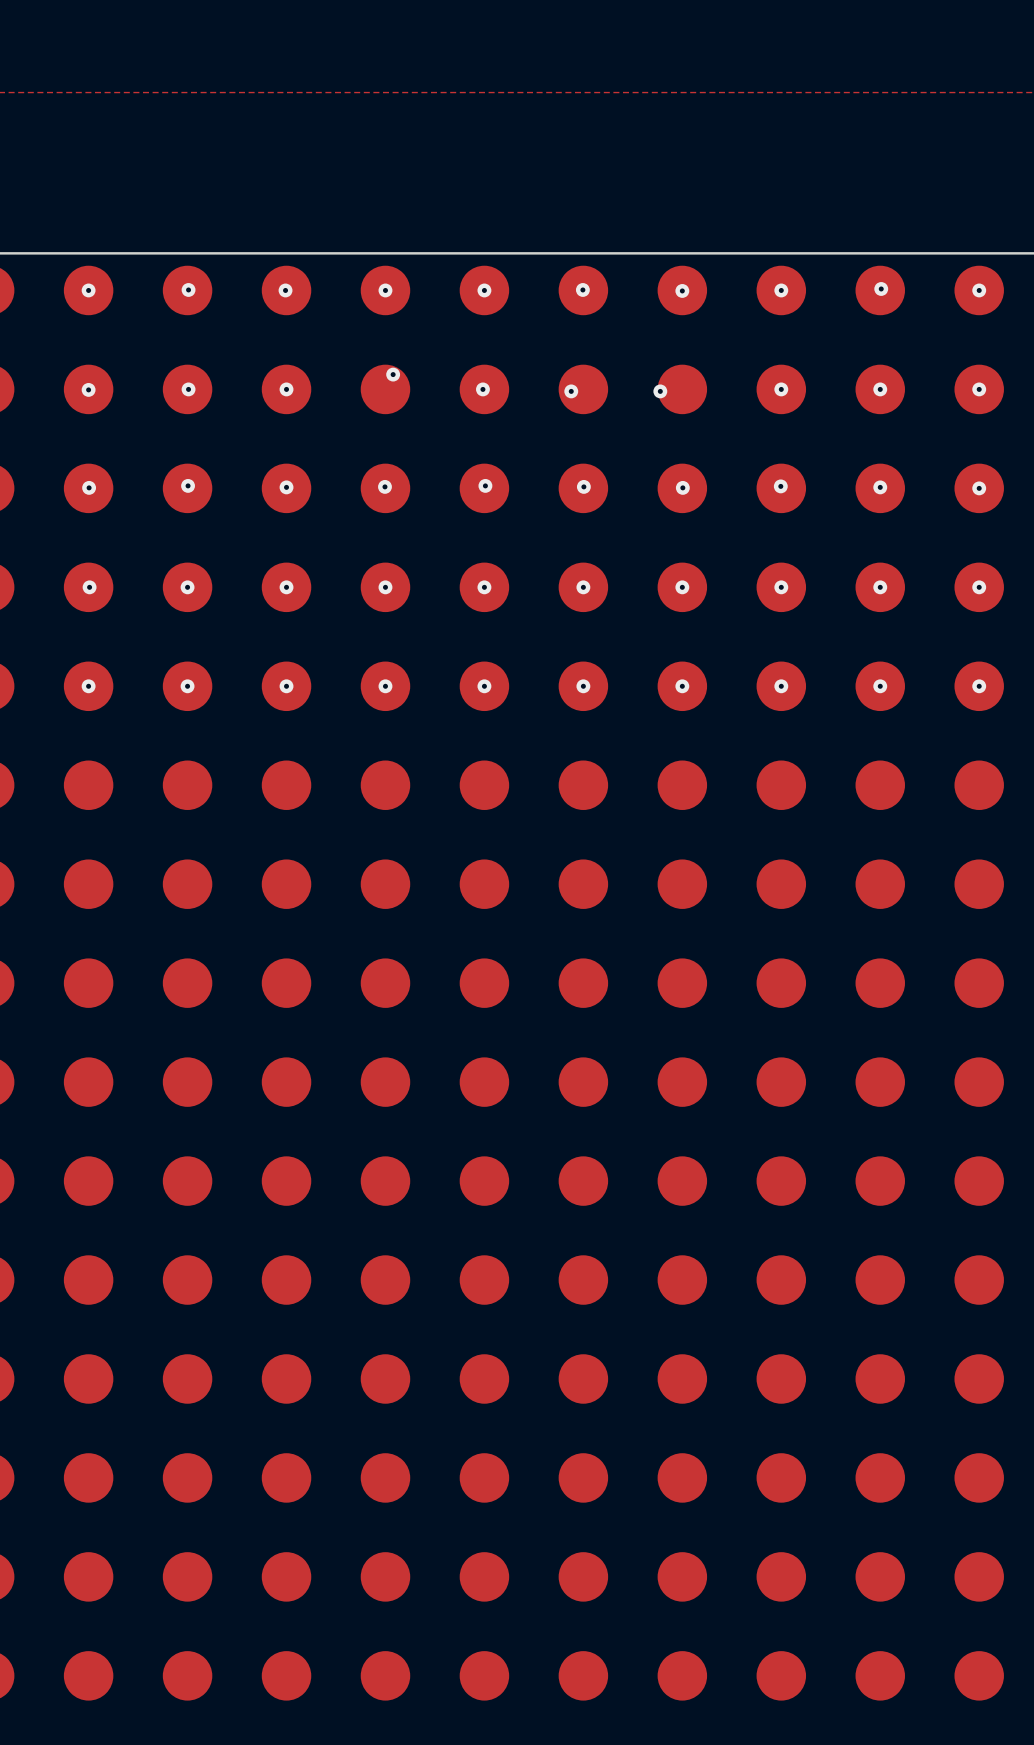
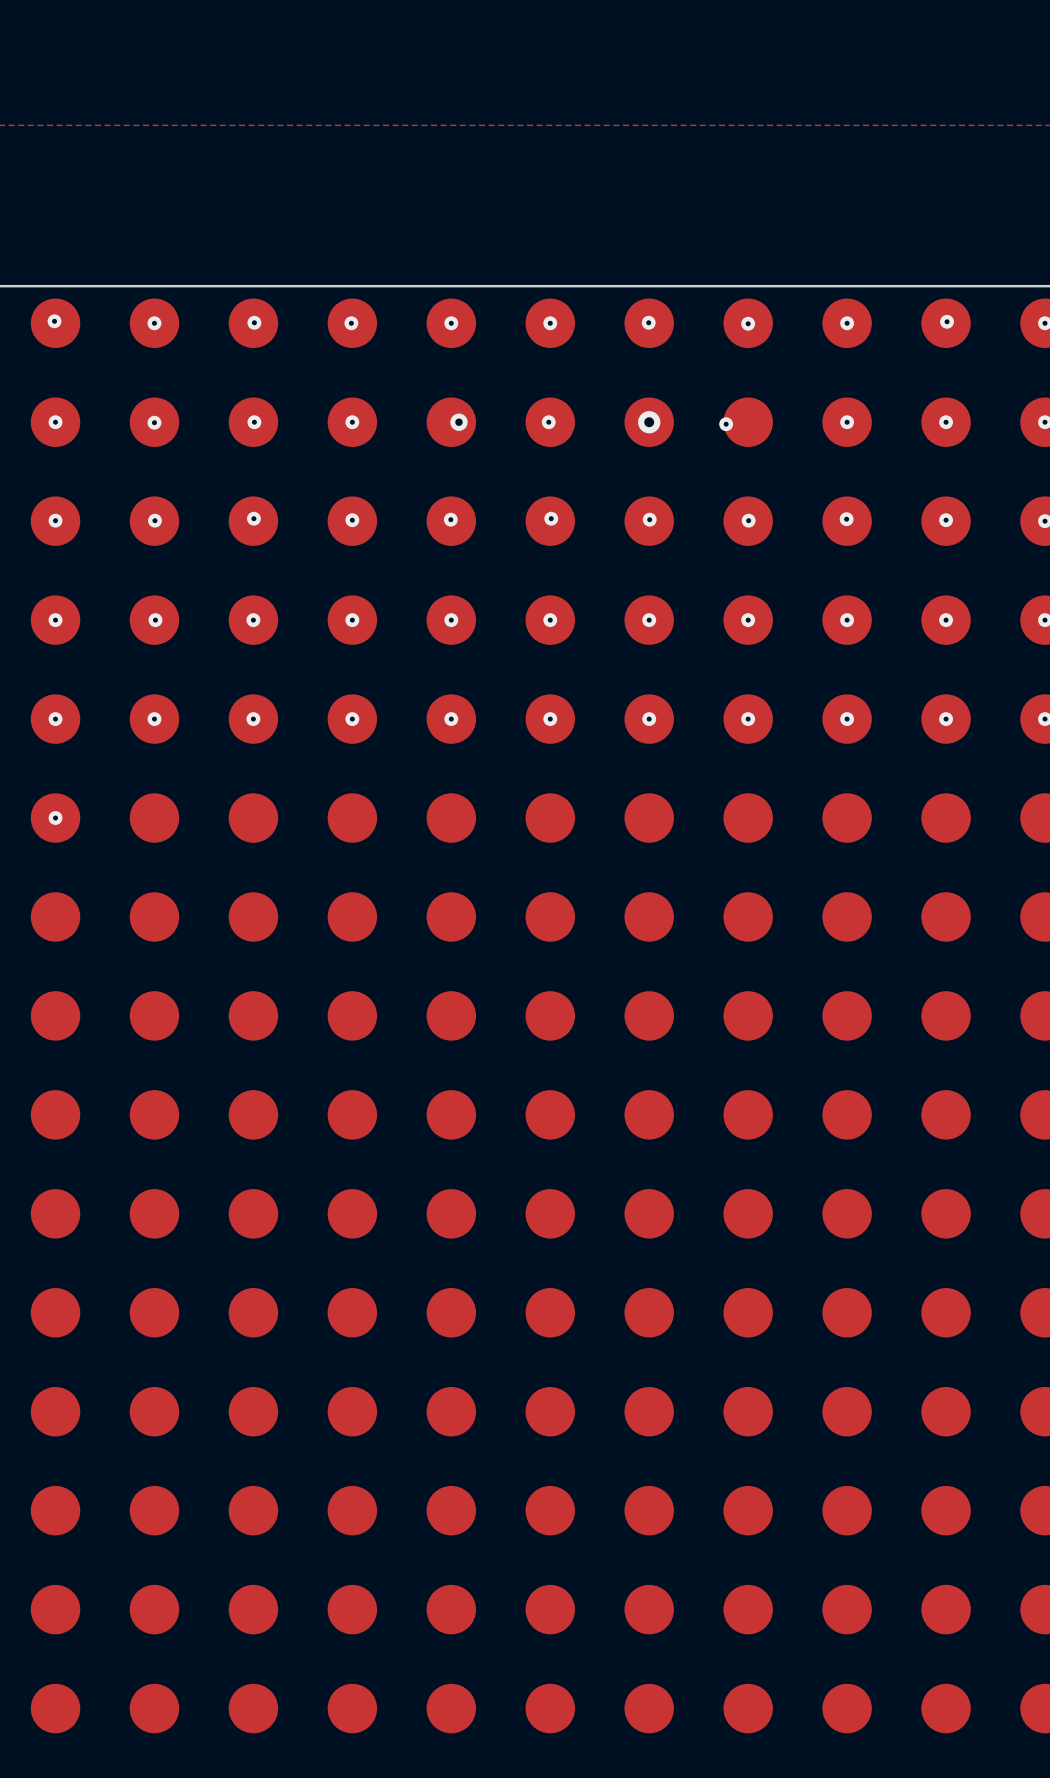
via position: (393, 374) -> (458, 422)
via size: [564, 384, 579, 399] -> [638, 411, 661, 434]

